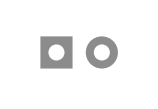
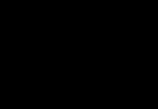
part: (79, 52) -> none

